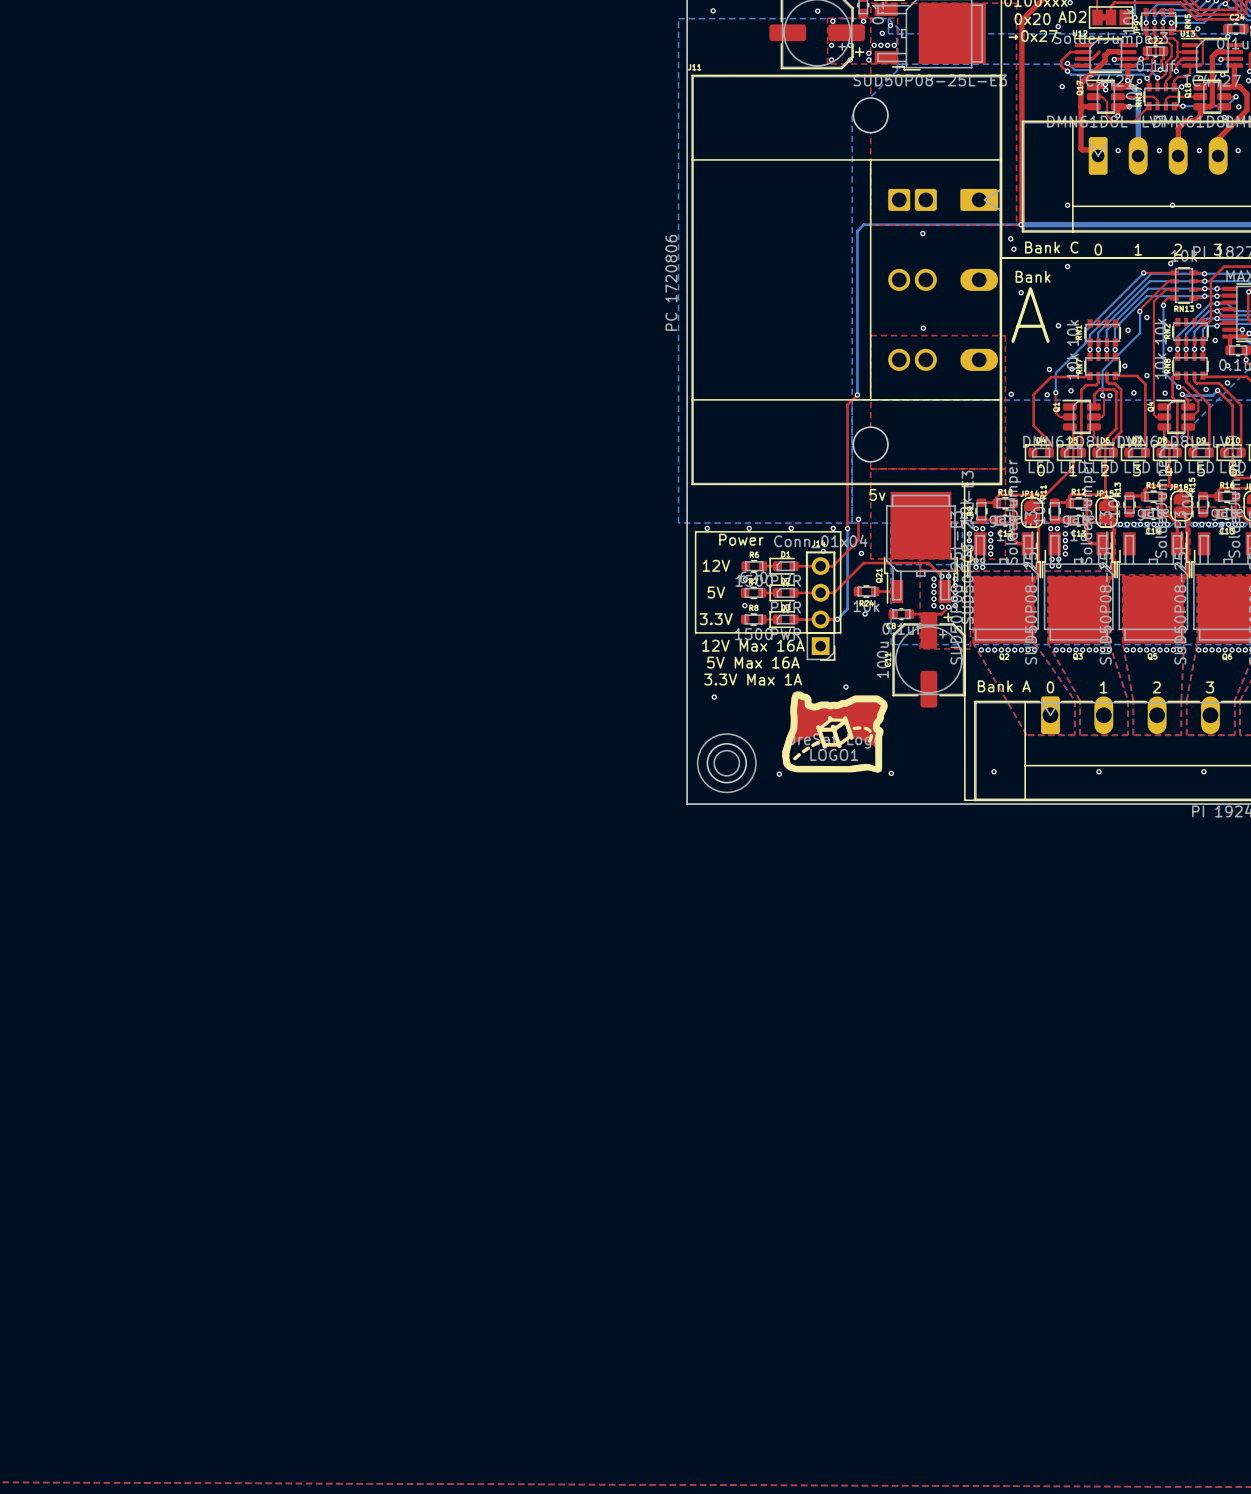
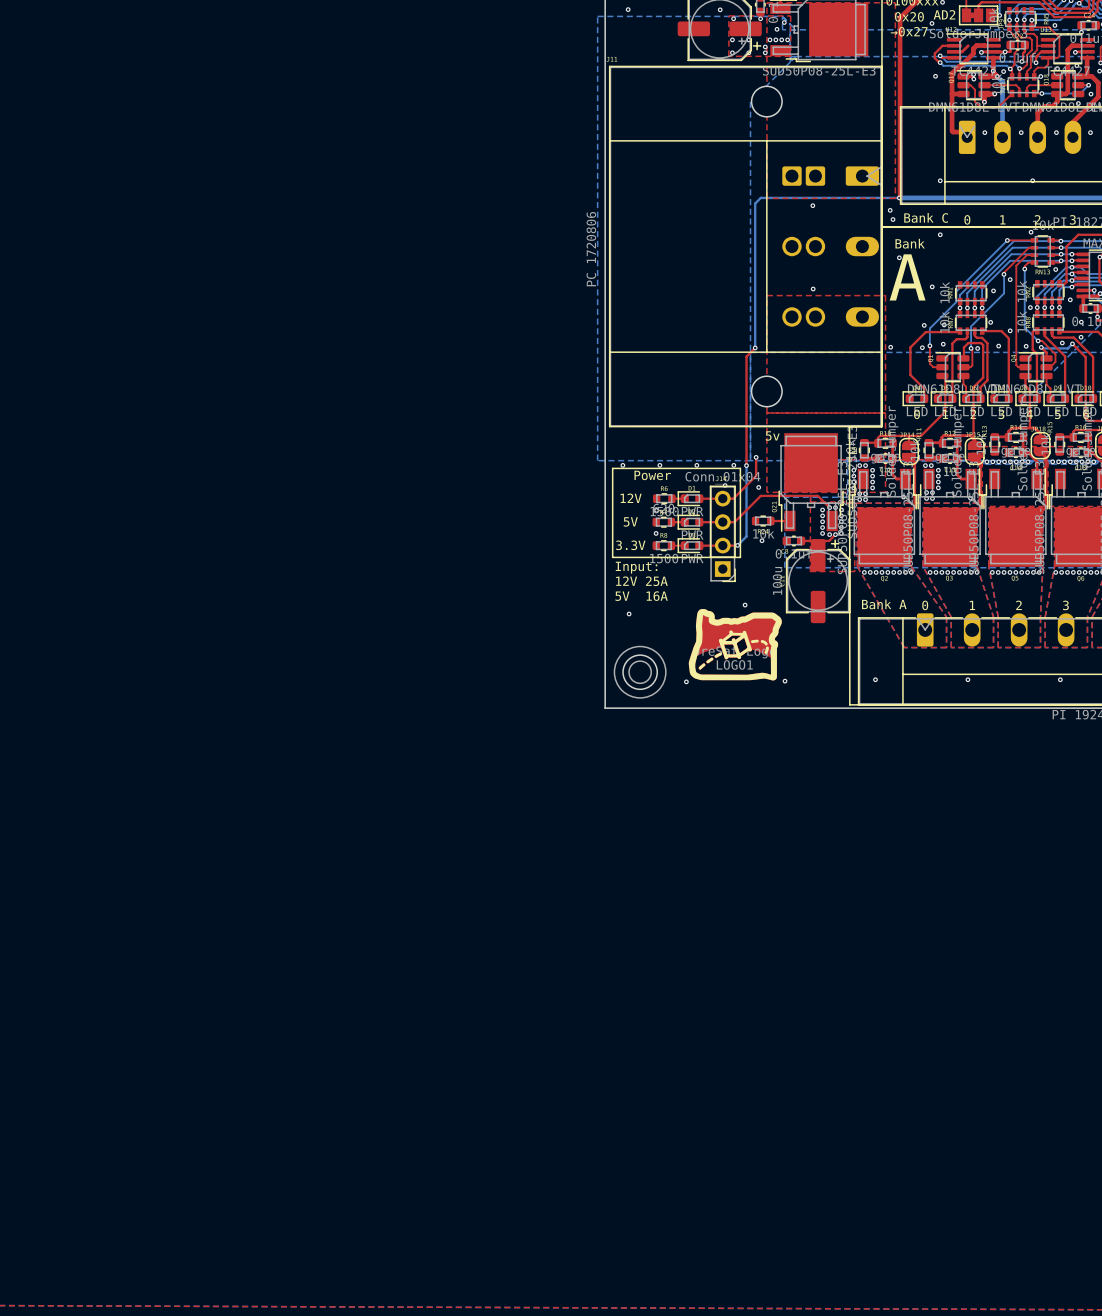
text: none -> Input: (636, 567)
text: 12V Max 16A (753, 645) -> none
text: none -> 12V 25A (641, 581)
text: 5V Max 16A (753, 662) -> 5V 16A (641, 596)
text: 3.3V Max 1A (753, 679) -> none

